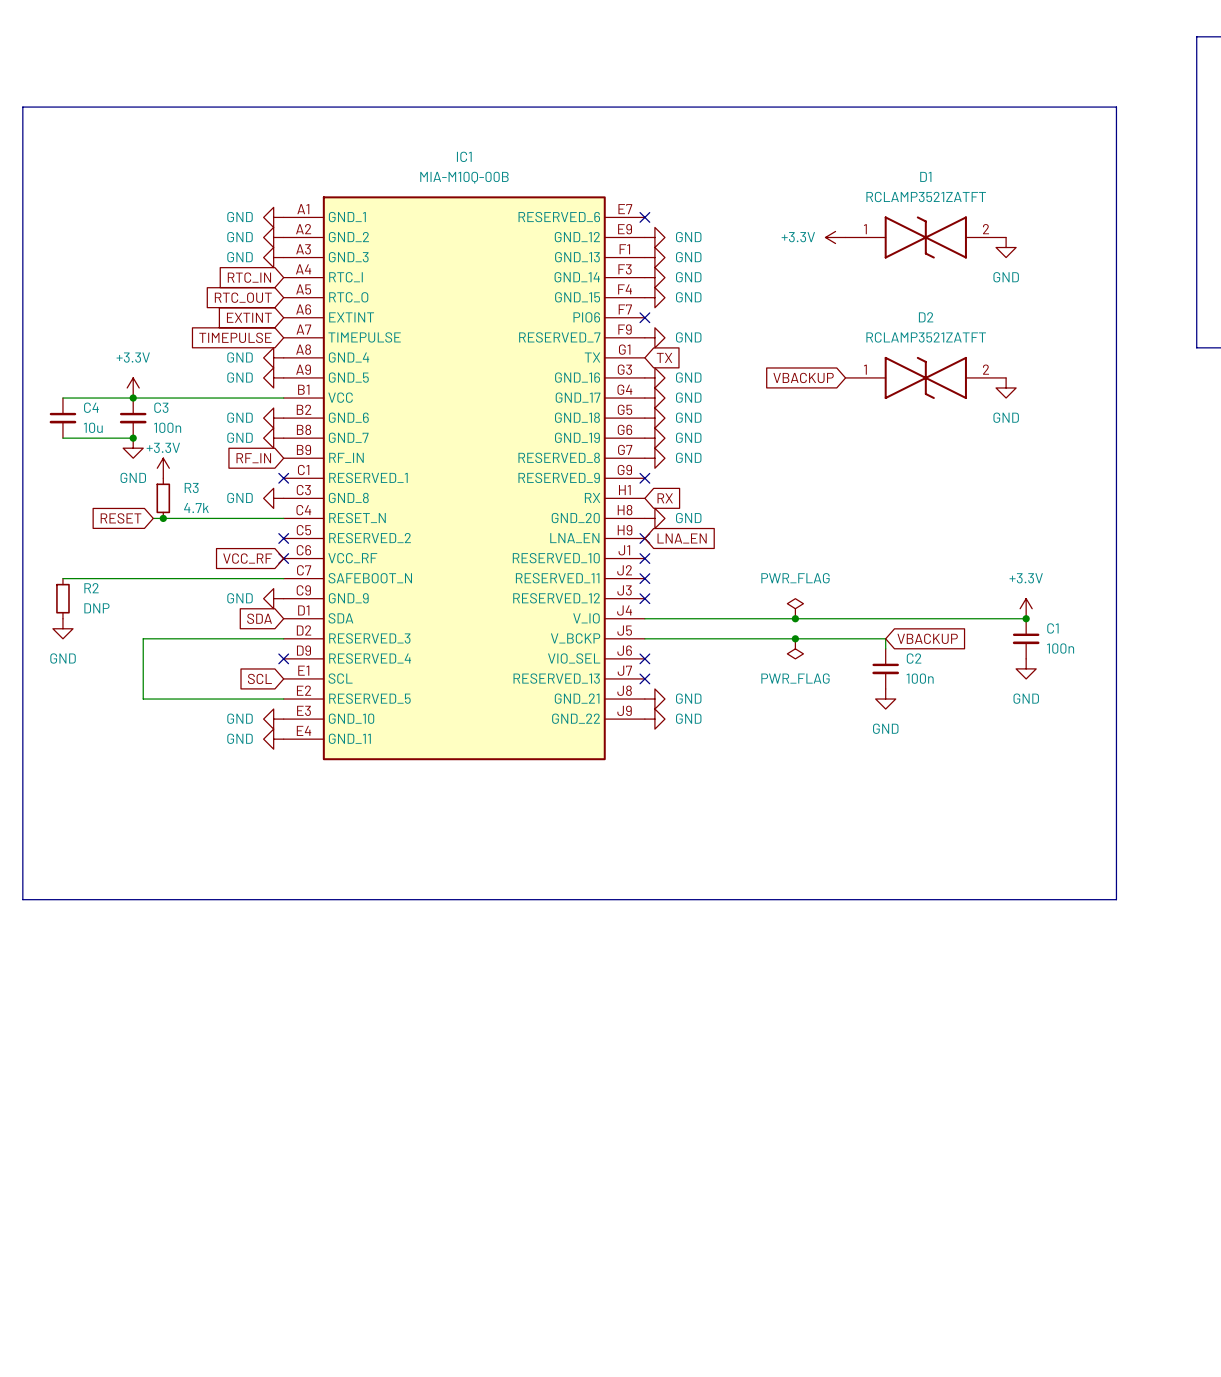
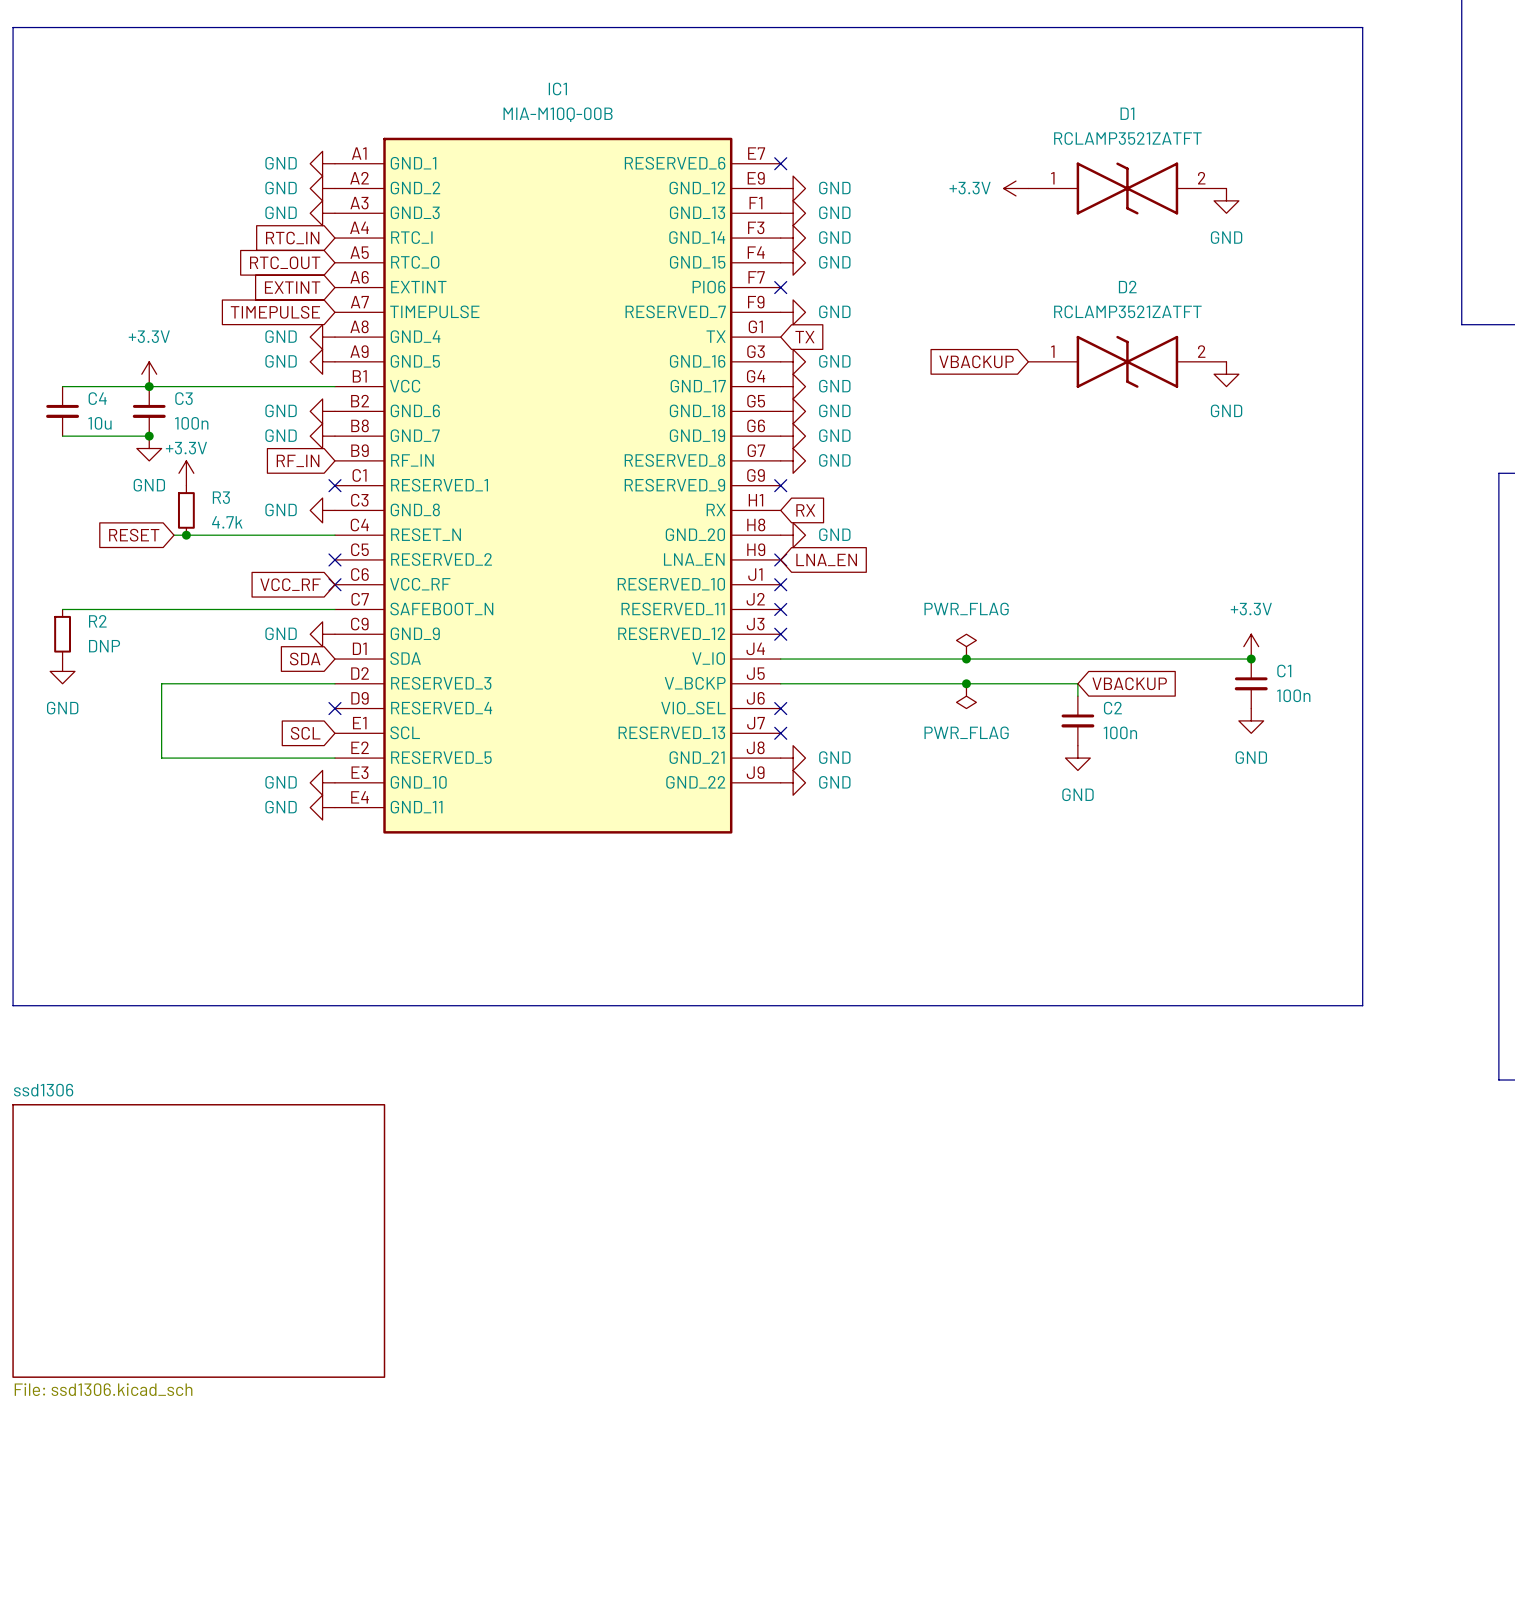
sheet ssd1306: none -> File: ssd1306.kicad_sch (198, 1240)

